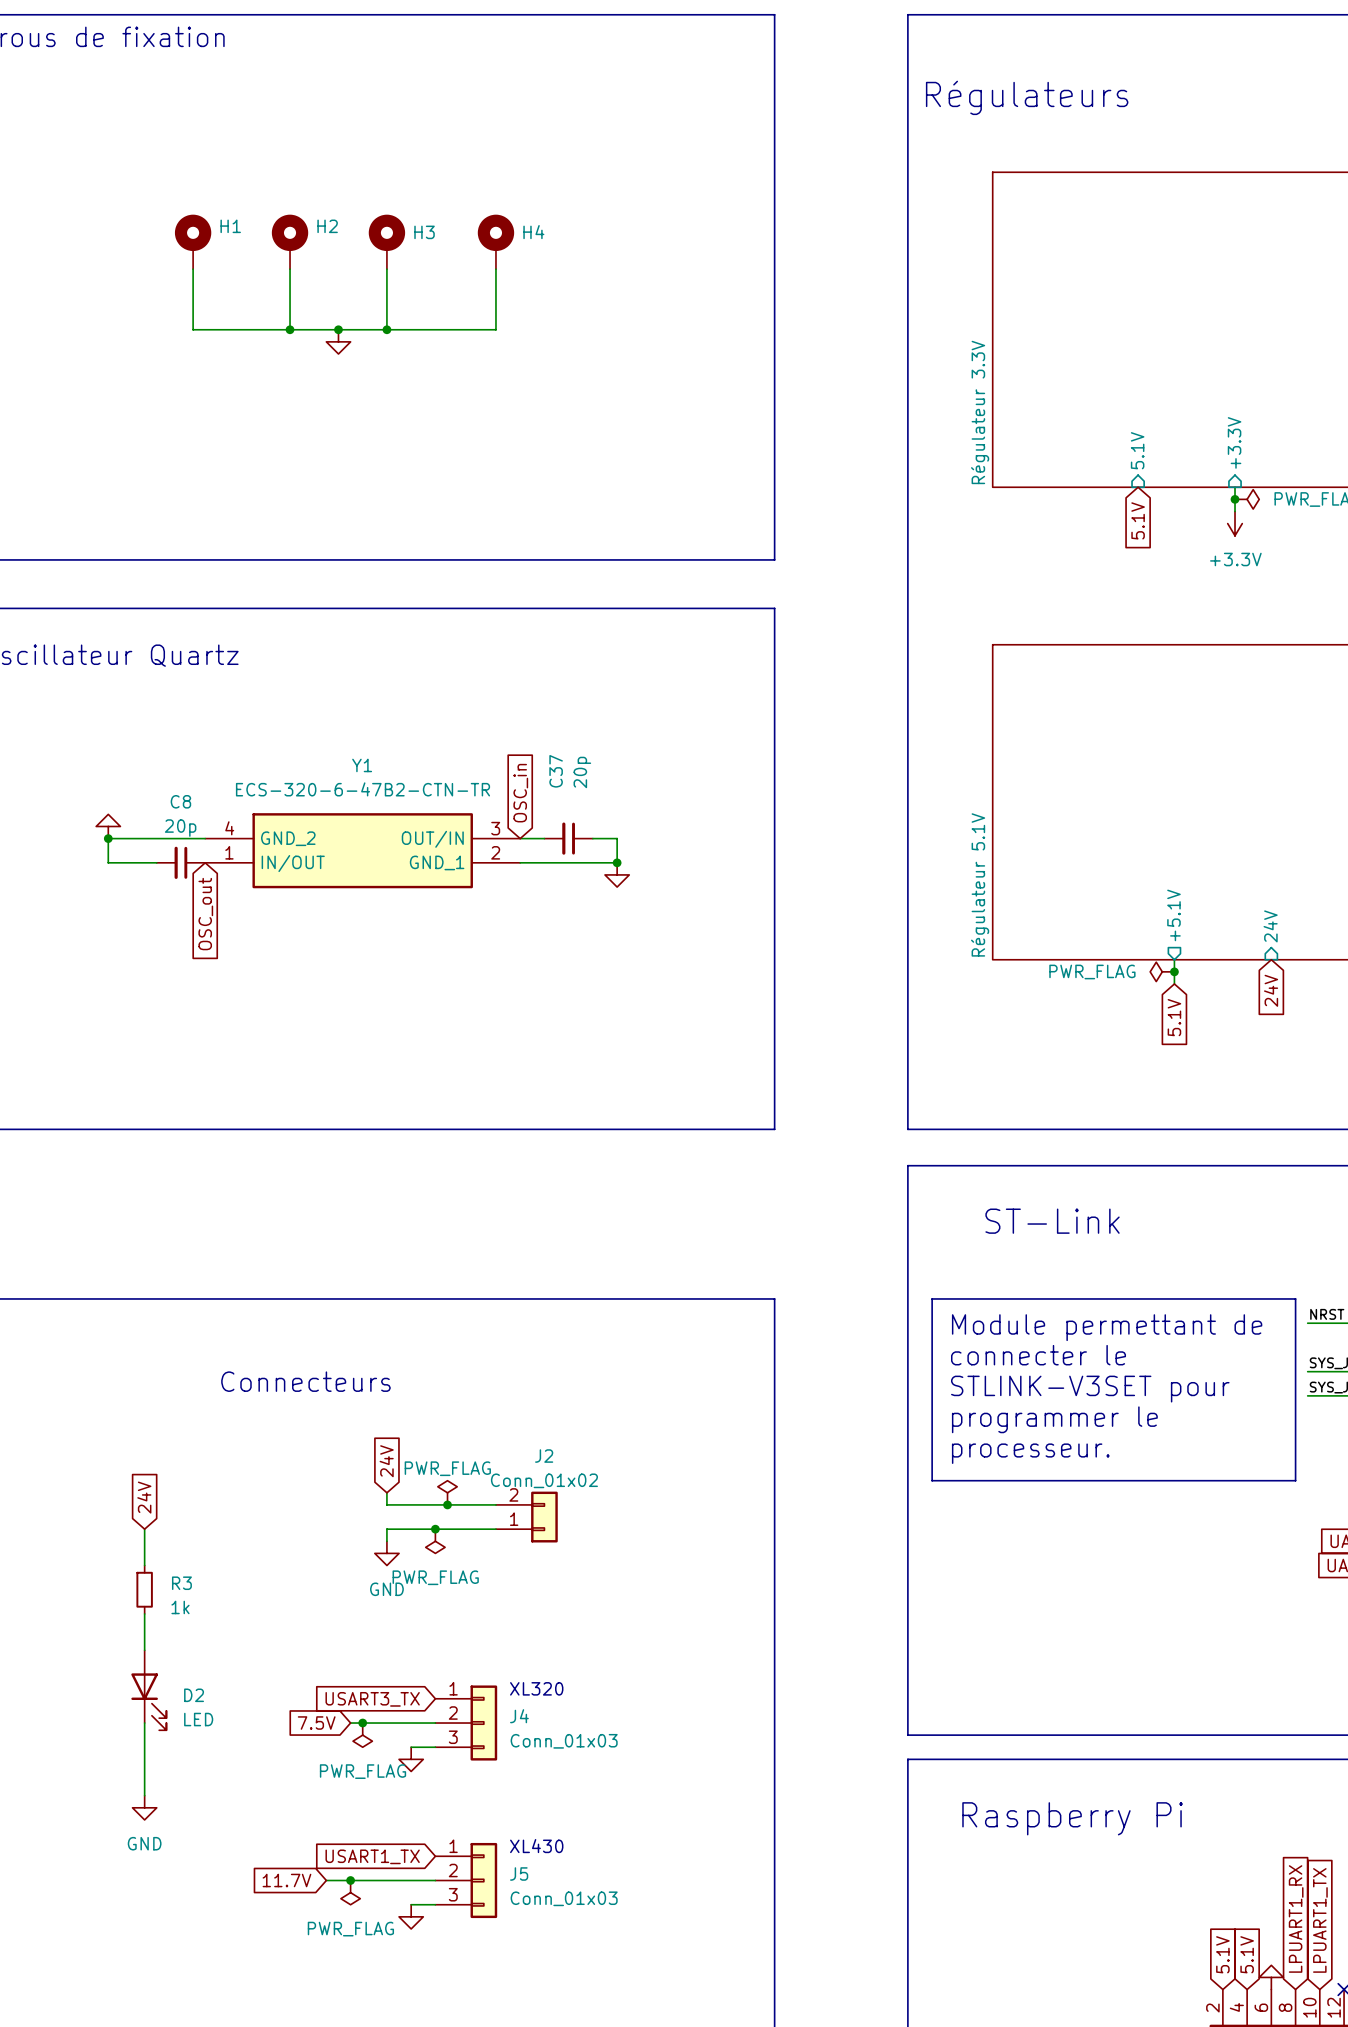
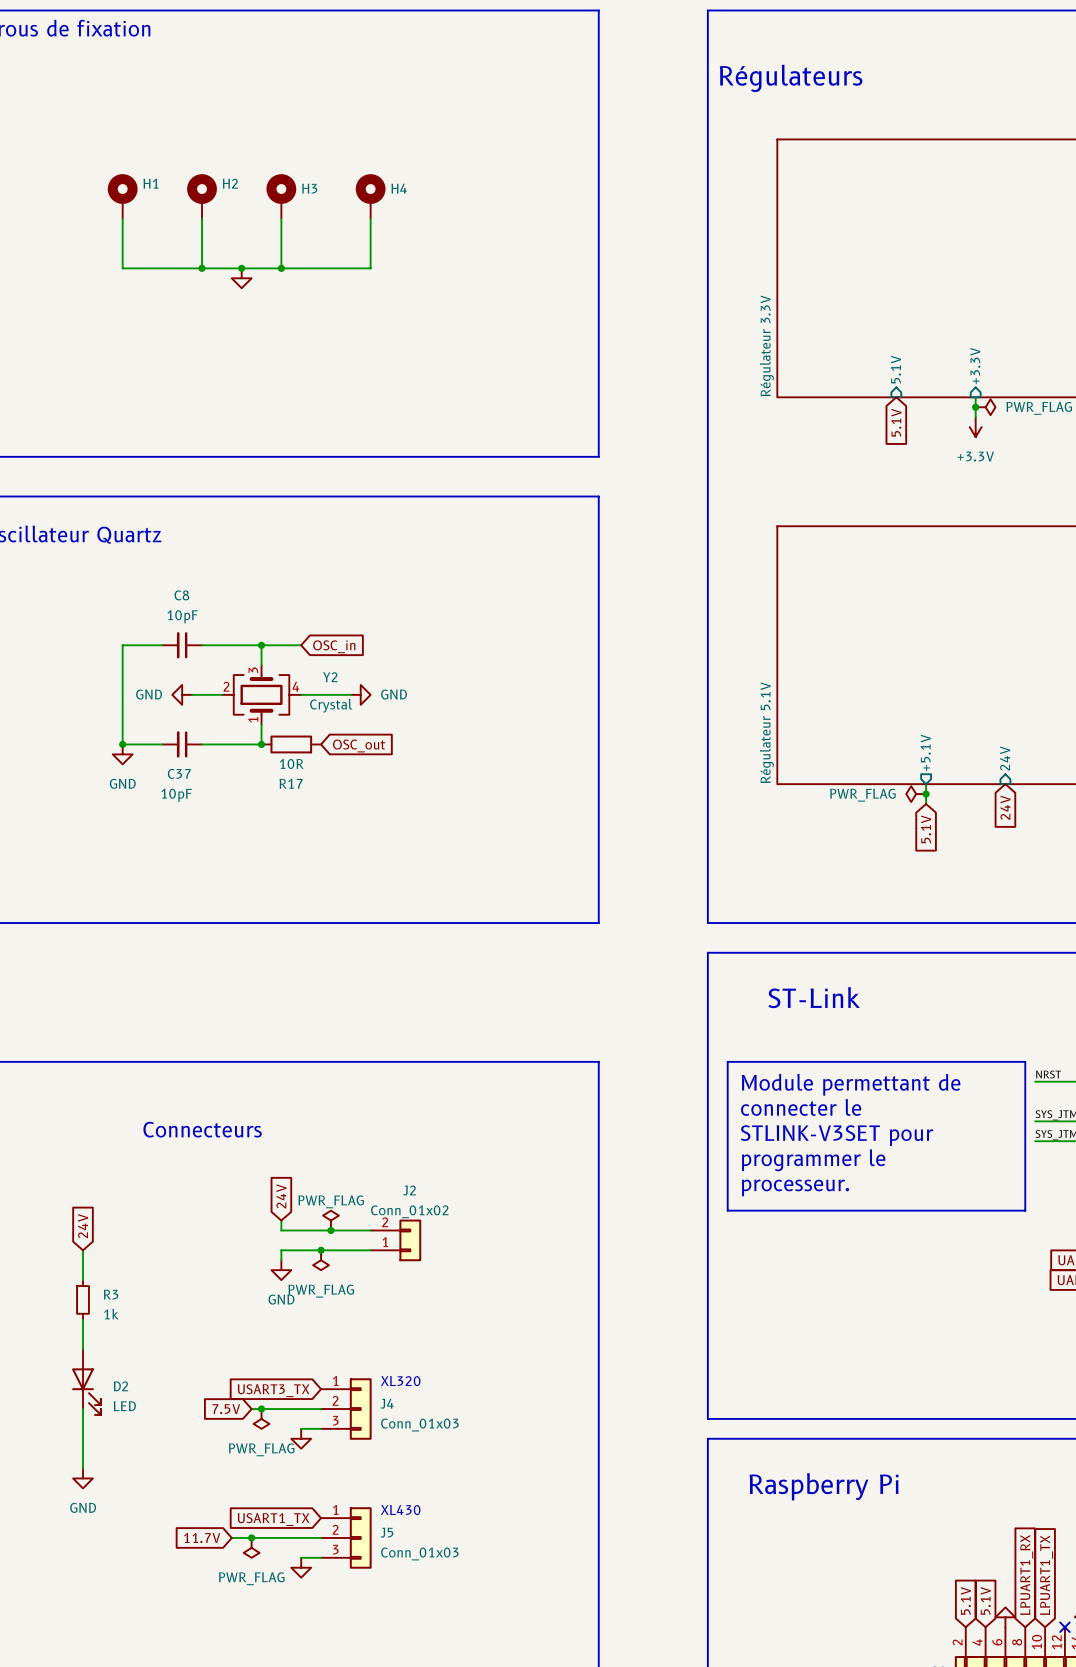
C37 name rotation: 0° (556, 771) -> 90° clockwise (179, 773)
C37 name position: C37 (556, 771) -> C37 (179, 773)
C37 value: 20p (582, 772) -> 10pF (176, 795)
wire: none -> (162, 645) (122, 645) (122, 744) (162, 744)
wire: none -> (202, 645) (301, 645)
wire: none -> (261, 645) (261, 665)
junction: none -> (261, 645)
global label rotation: 0° (520, 793) -> 90° clockwise (334, 646)
power symbol: (108, 826) -> none
C8 value: 20p (180, 828) -> 10pF (182, 616)
junction: (108, 838) -> none
wire: (205, 838) (108, 838) (108, 862) (156, 862) -> none
wire: (520, 838) (544, 838) -> none
C37 position: (568, 838) -> (182, 744)
wire: (592, 838) (617, 838) (617, 862) (520, 862) -> none
power symbol: none -> GND (182, 694)
Y1: ECS-320-6-47B2-CTN-TR (362, 850) -> none
Y2: none -> Crystal (261, 694)
power symbol: none -> GND (360, 694)
C8 position: (180, 862) -> (182, 645)
junction: (617, 862) -> none
power symbol: (617, 874) -> none
wire: none -> (261, 724) (261, 744) (202, 744)
junction: none -> (122, 744)
junction: none -> (261, 744)
R17: none -> 10R (291, 744)
global label rotation: 0° (205, 914) -> 90° counterclockwise (359, 745)
global label position: OSC_out (205, 914) -> OSC_out (359, 745)
power symbol: none -> GND (122, 754)

